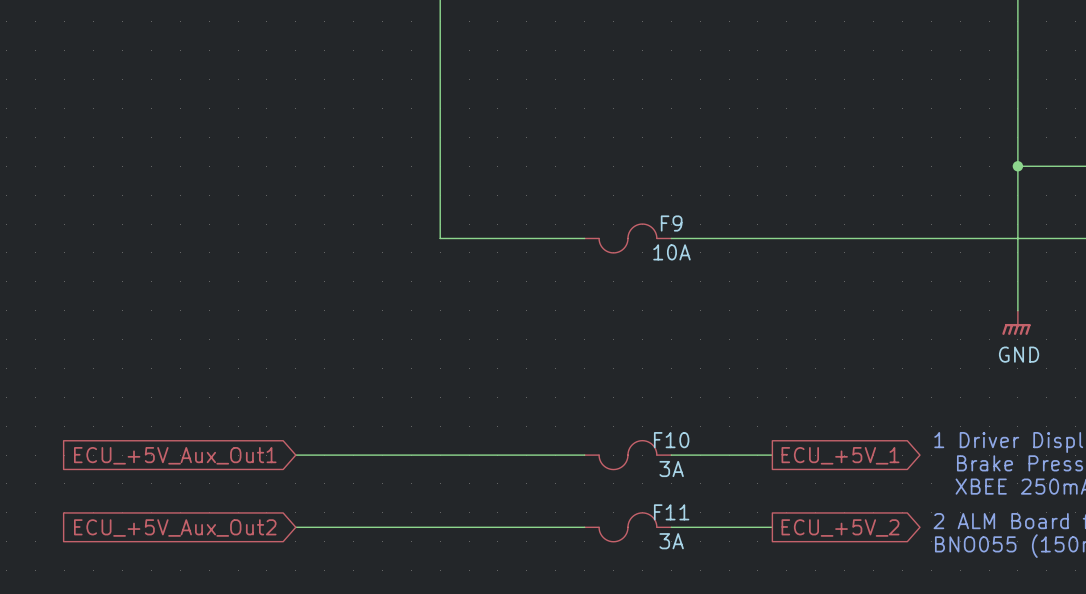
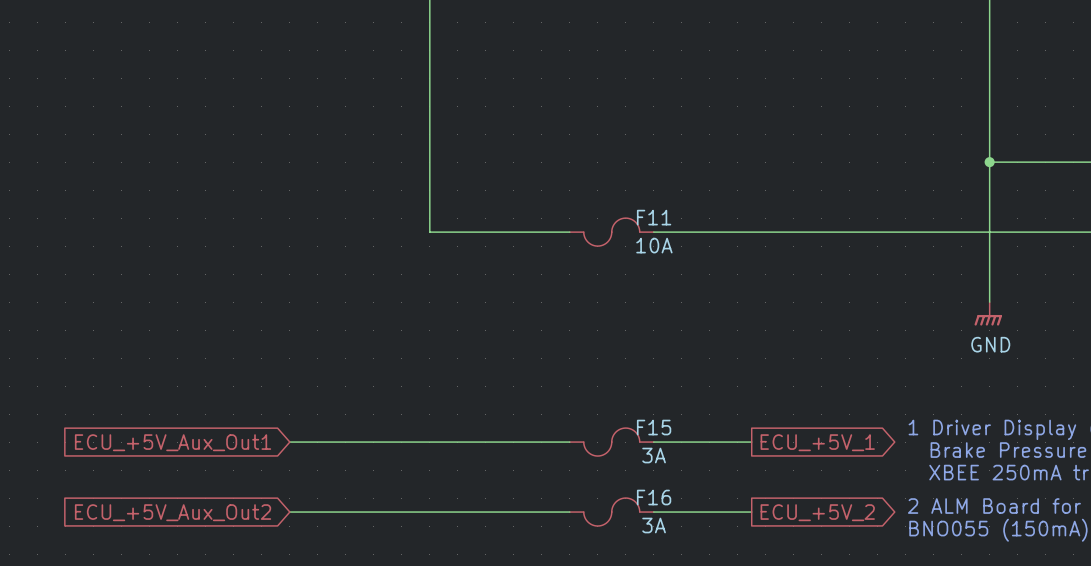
F9 name: F9 (671, 223) -> F11 (654, 217)
F10 name: F10 (671, 440) -> F15 (654, 427)
F11 name: F11 (671, 512) -> F16 (654, 497)

